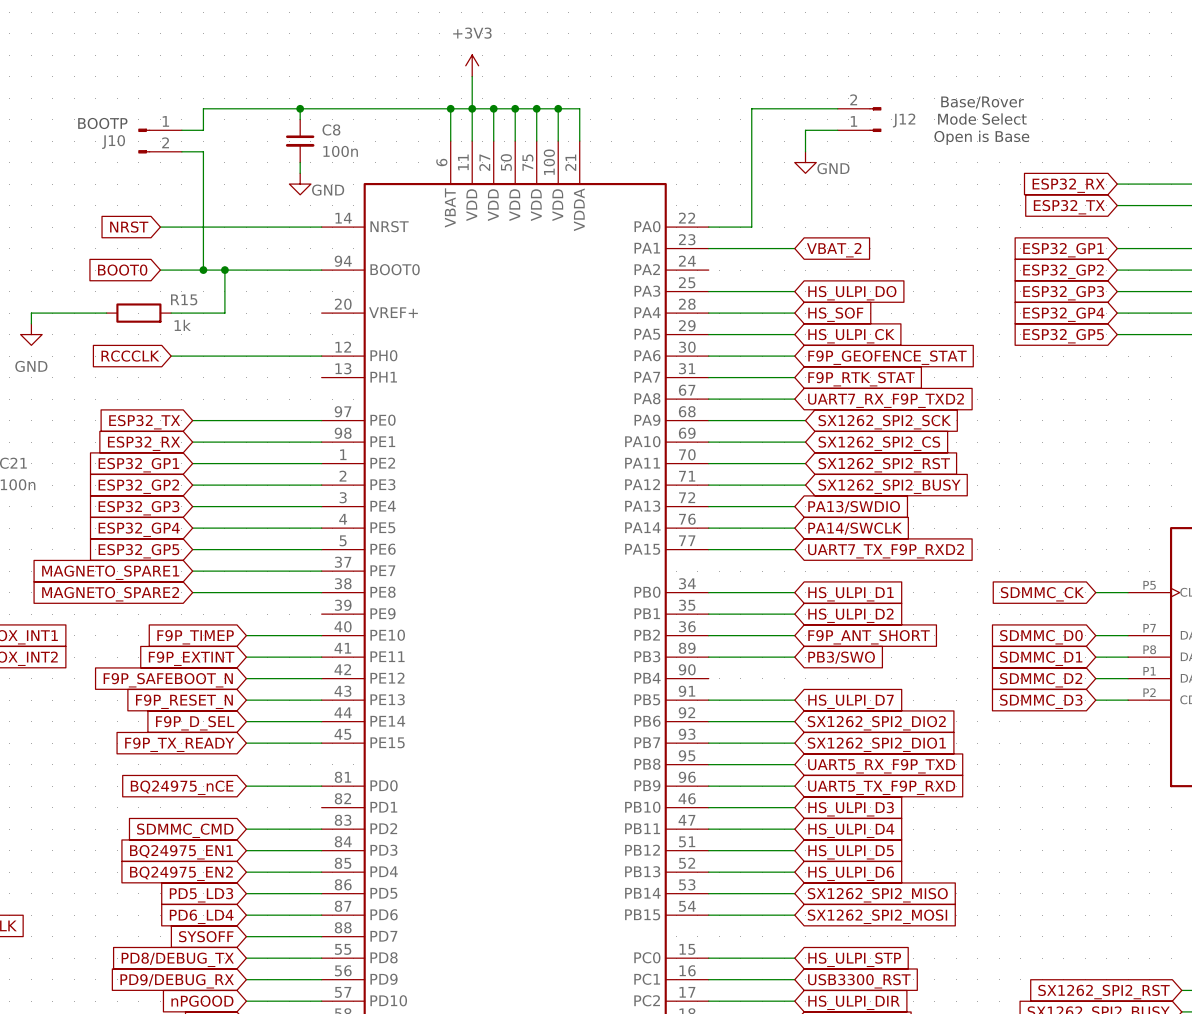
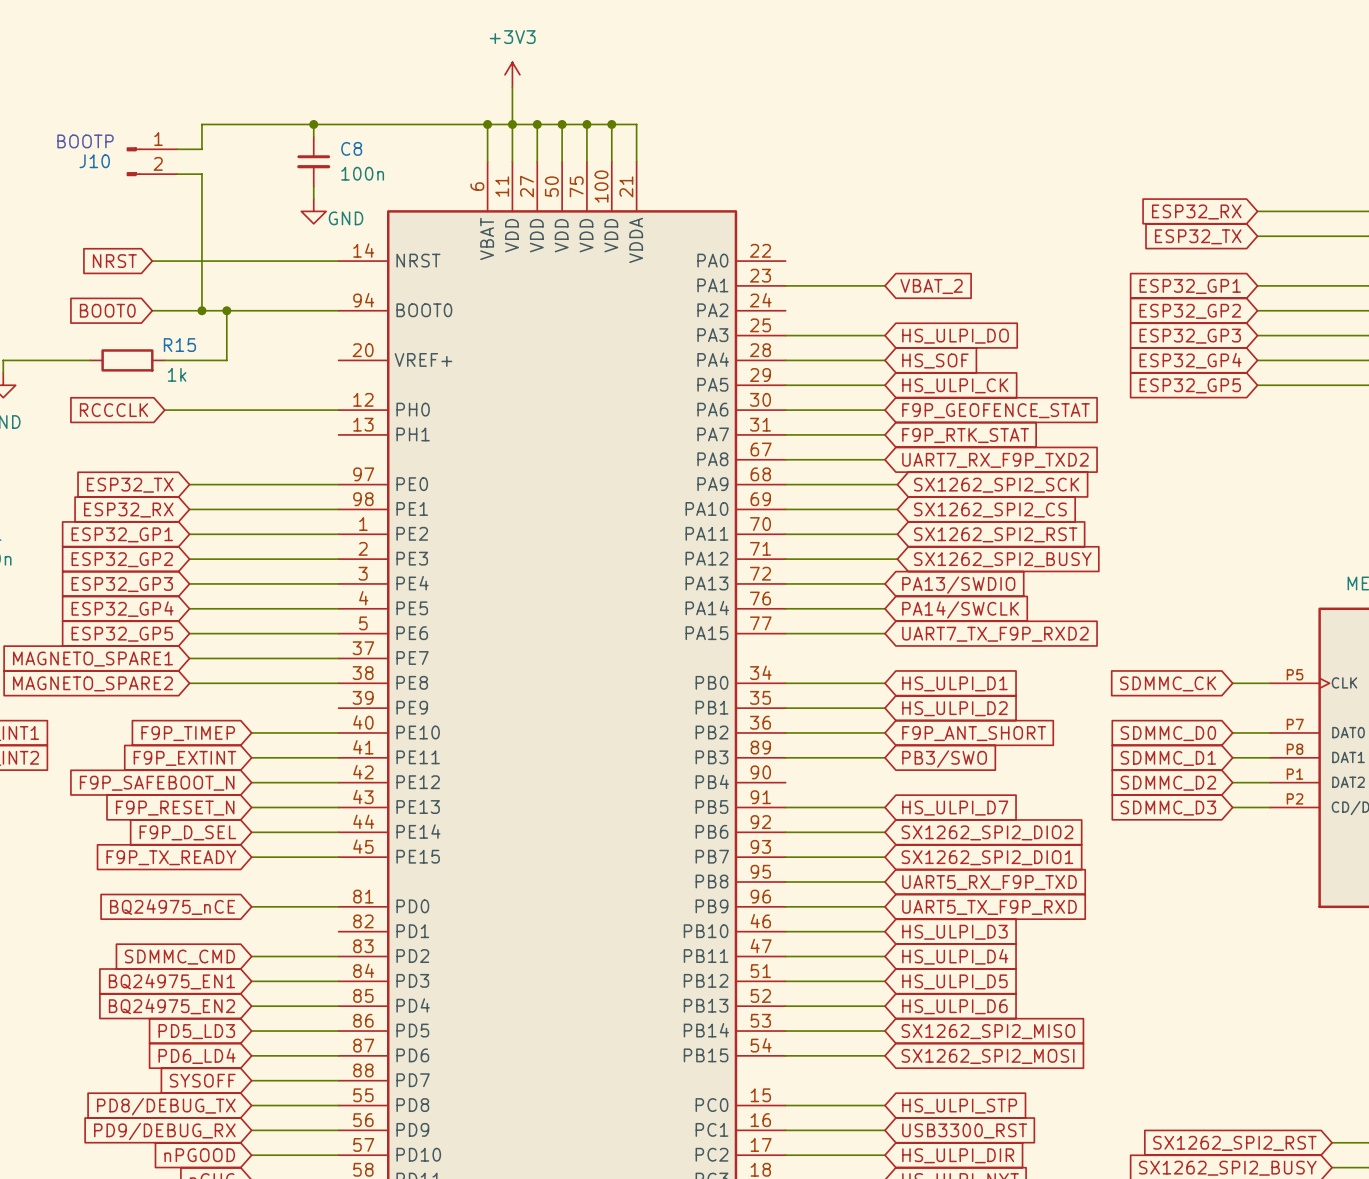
text: Base/Rover (982, 102) -> none
wire: (837, 108) (751, 108) (751, 227) (708, 227) -> none
J12: (859, 119) -> none
text: Mode Select (982, 119) -> none
wire: (837, 130) (805, 130) (805, 151) -> none
text: Open is Base (981, 137) -> none
power symbol: GND (805, 162) -> none

